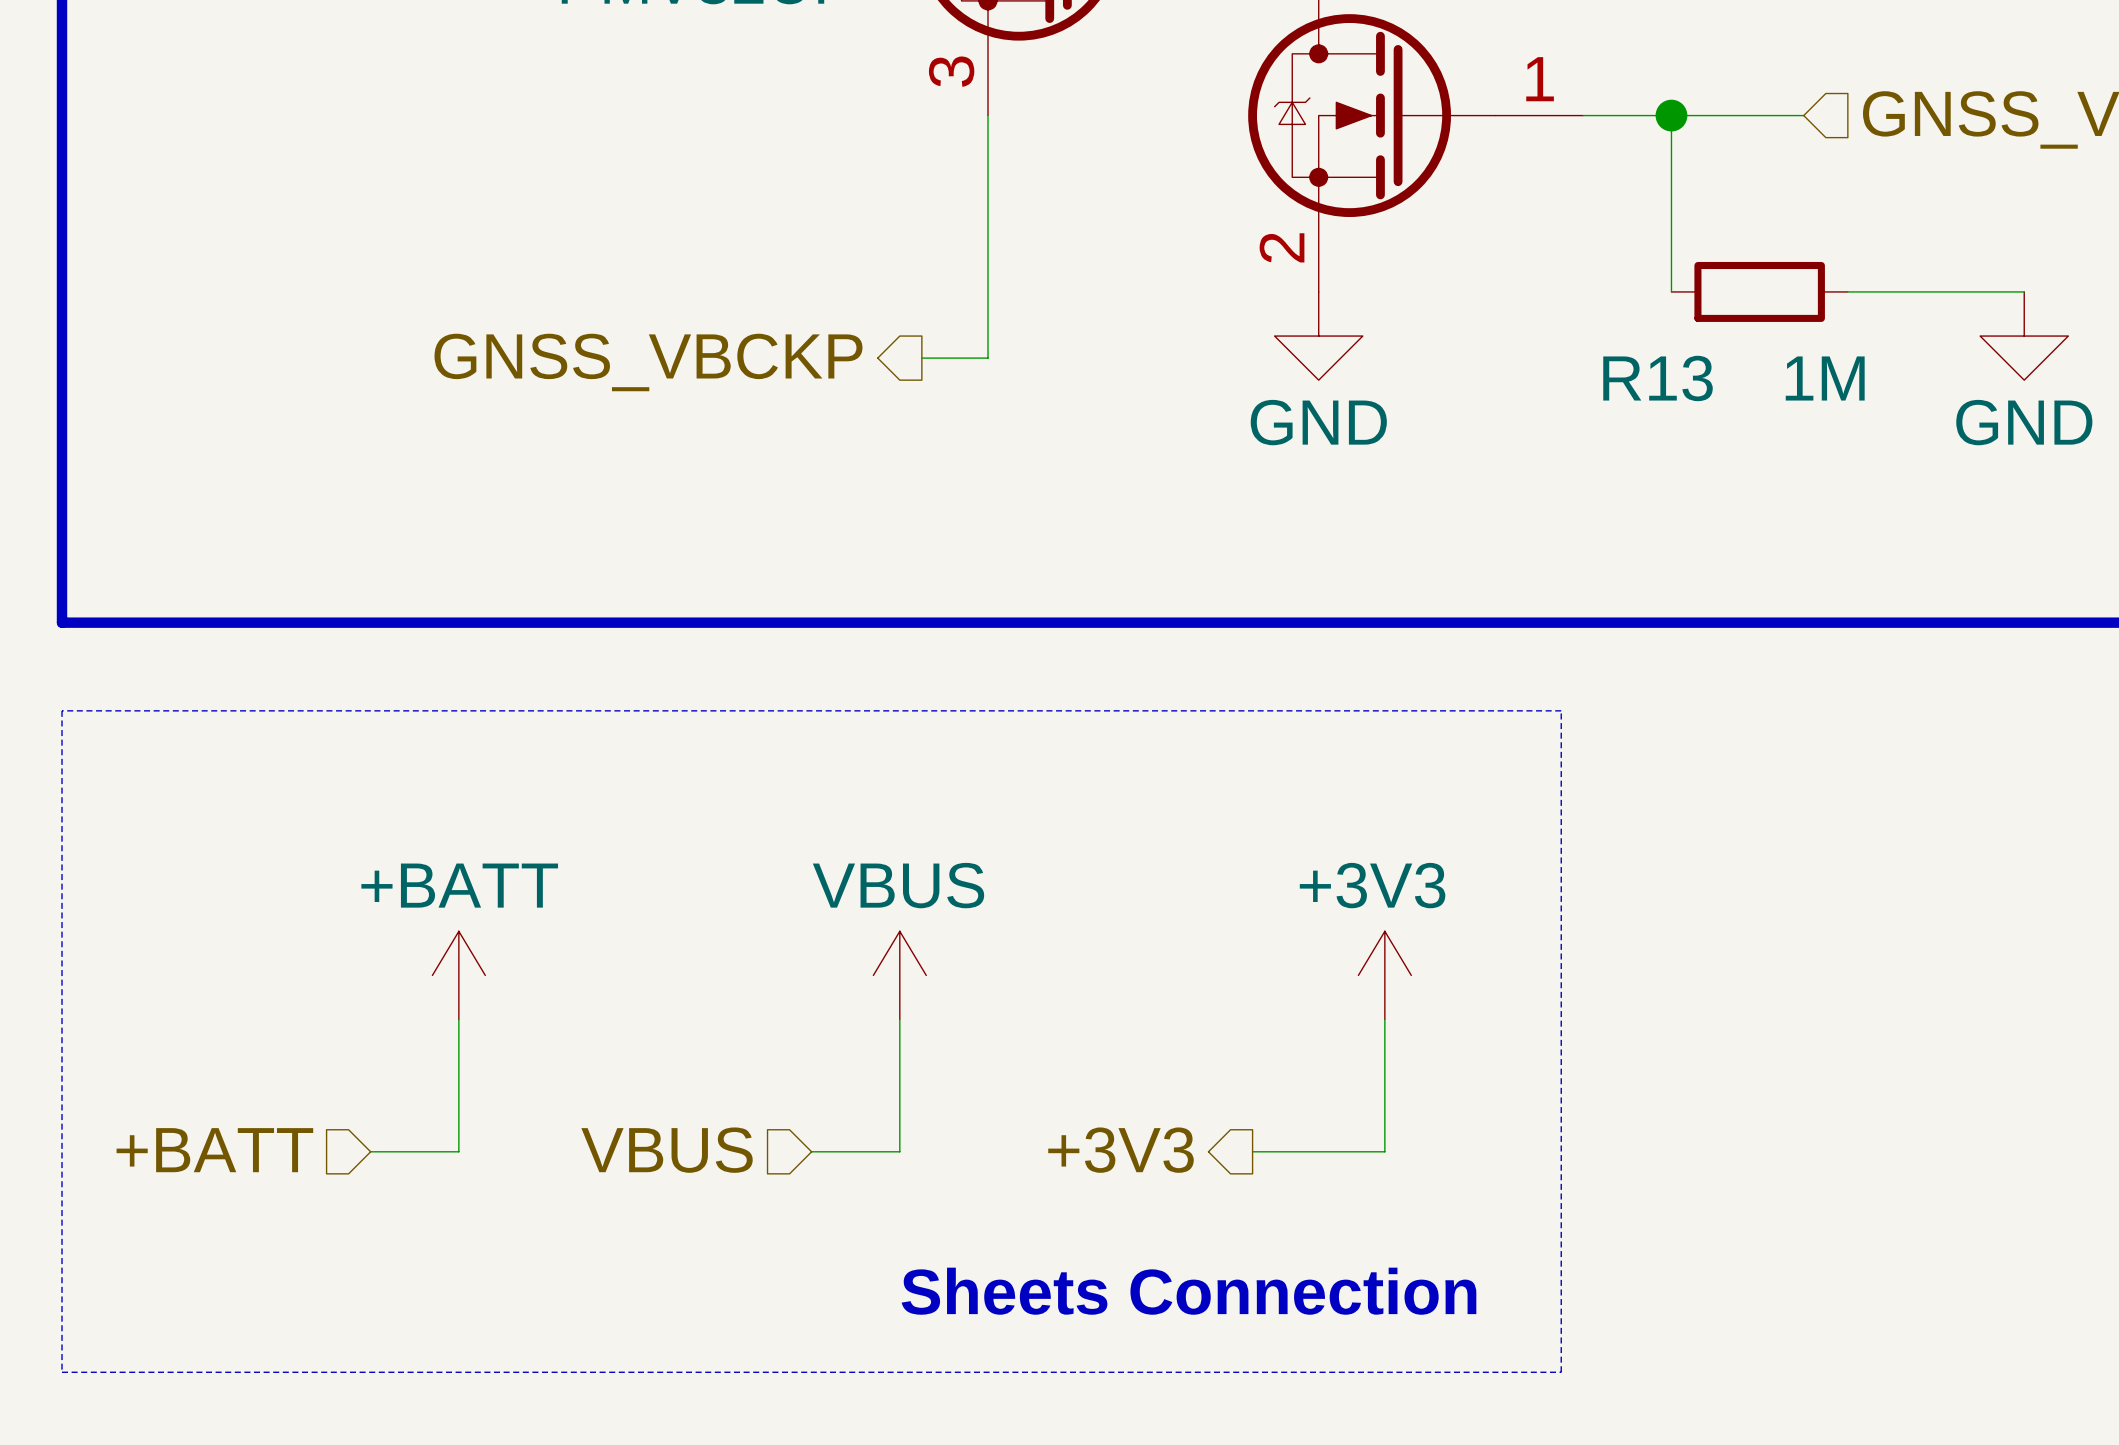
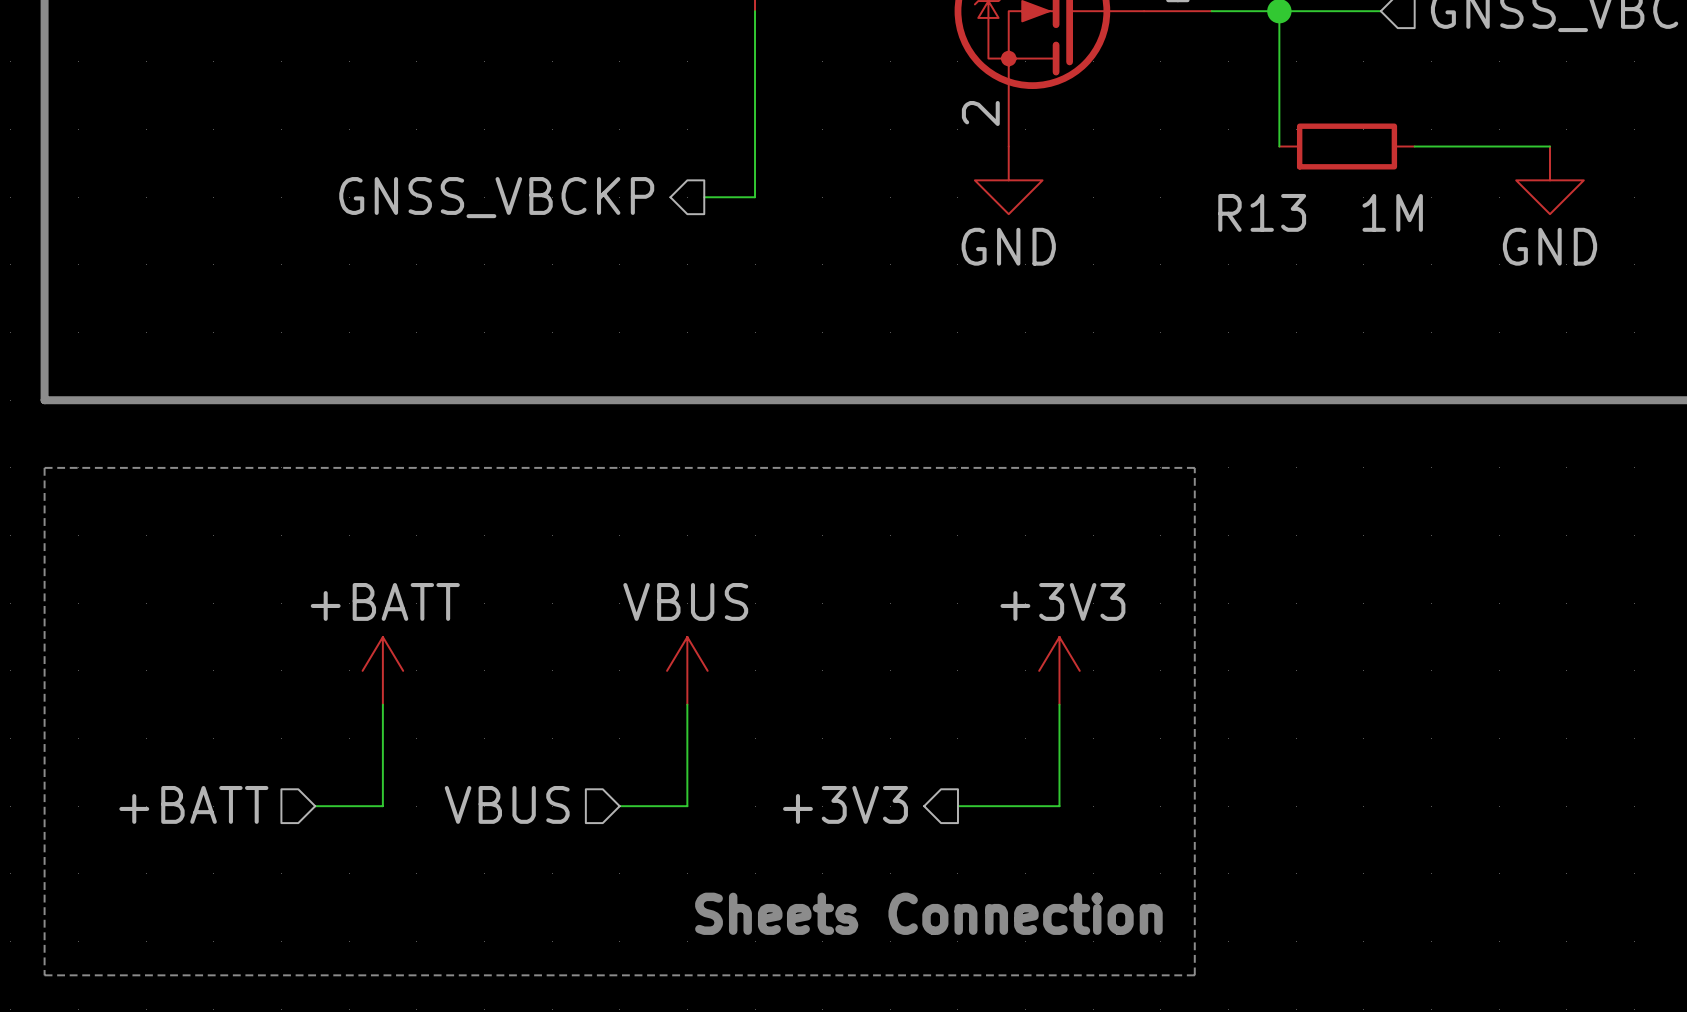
power symbol position: +BATT (458, 975) -> +BATT (382, 670)
wire: (458, 1019) (458, 1151) -> (382, 704) (382, 806) (349, 806)
hierarchical label position: +BATT (214, 1150) -> +BATT (193, 804)
wire: (370, 1151) (414, 1151) -> none

